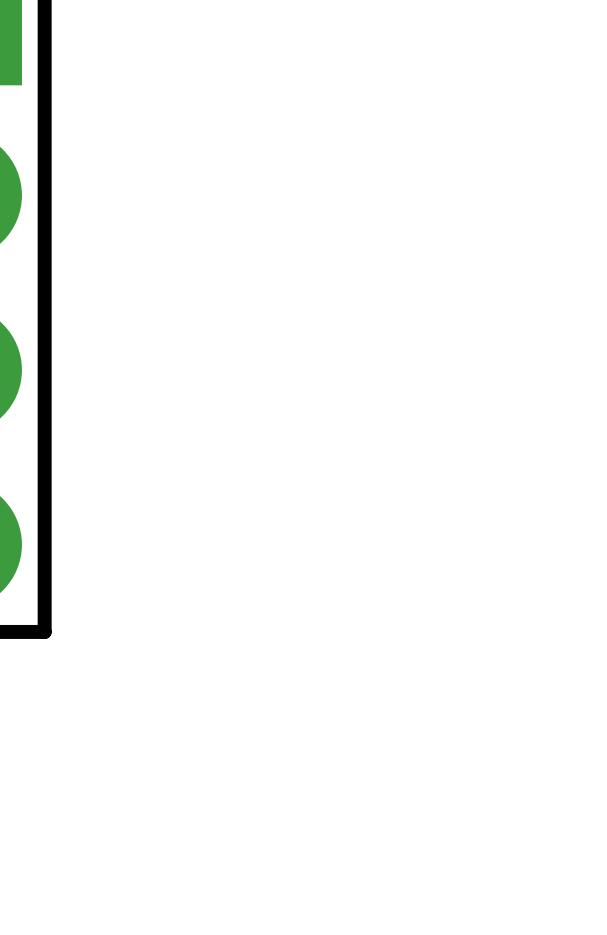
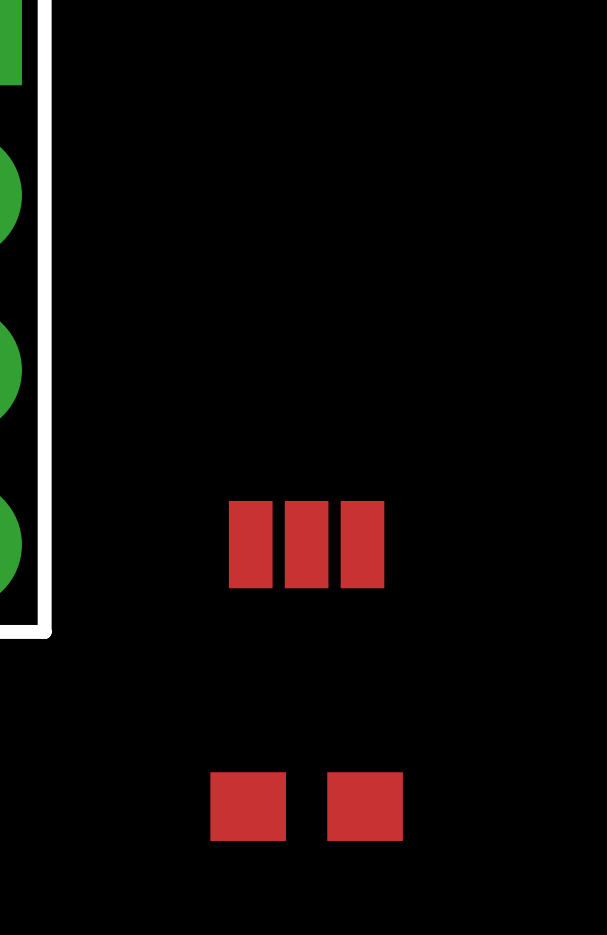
part: none -> (306, 544)
part: none -> (306, 806)

